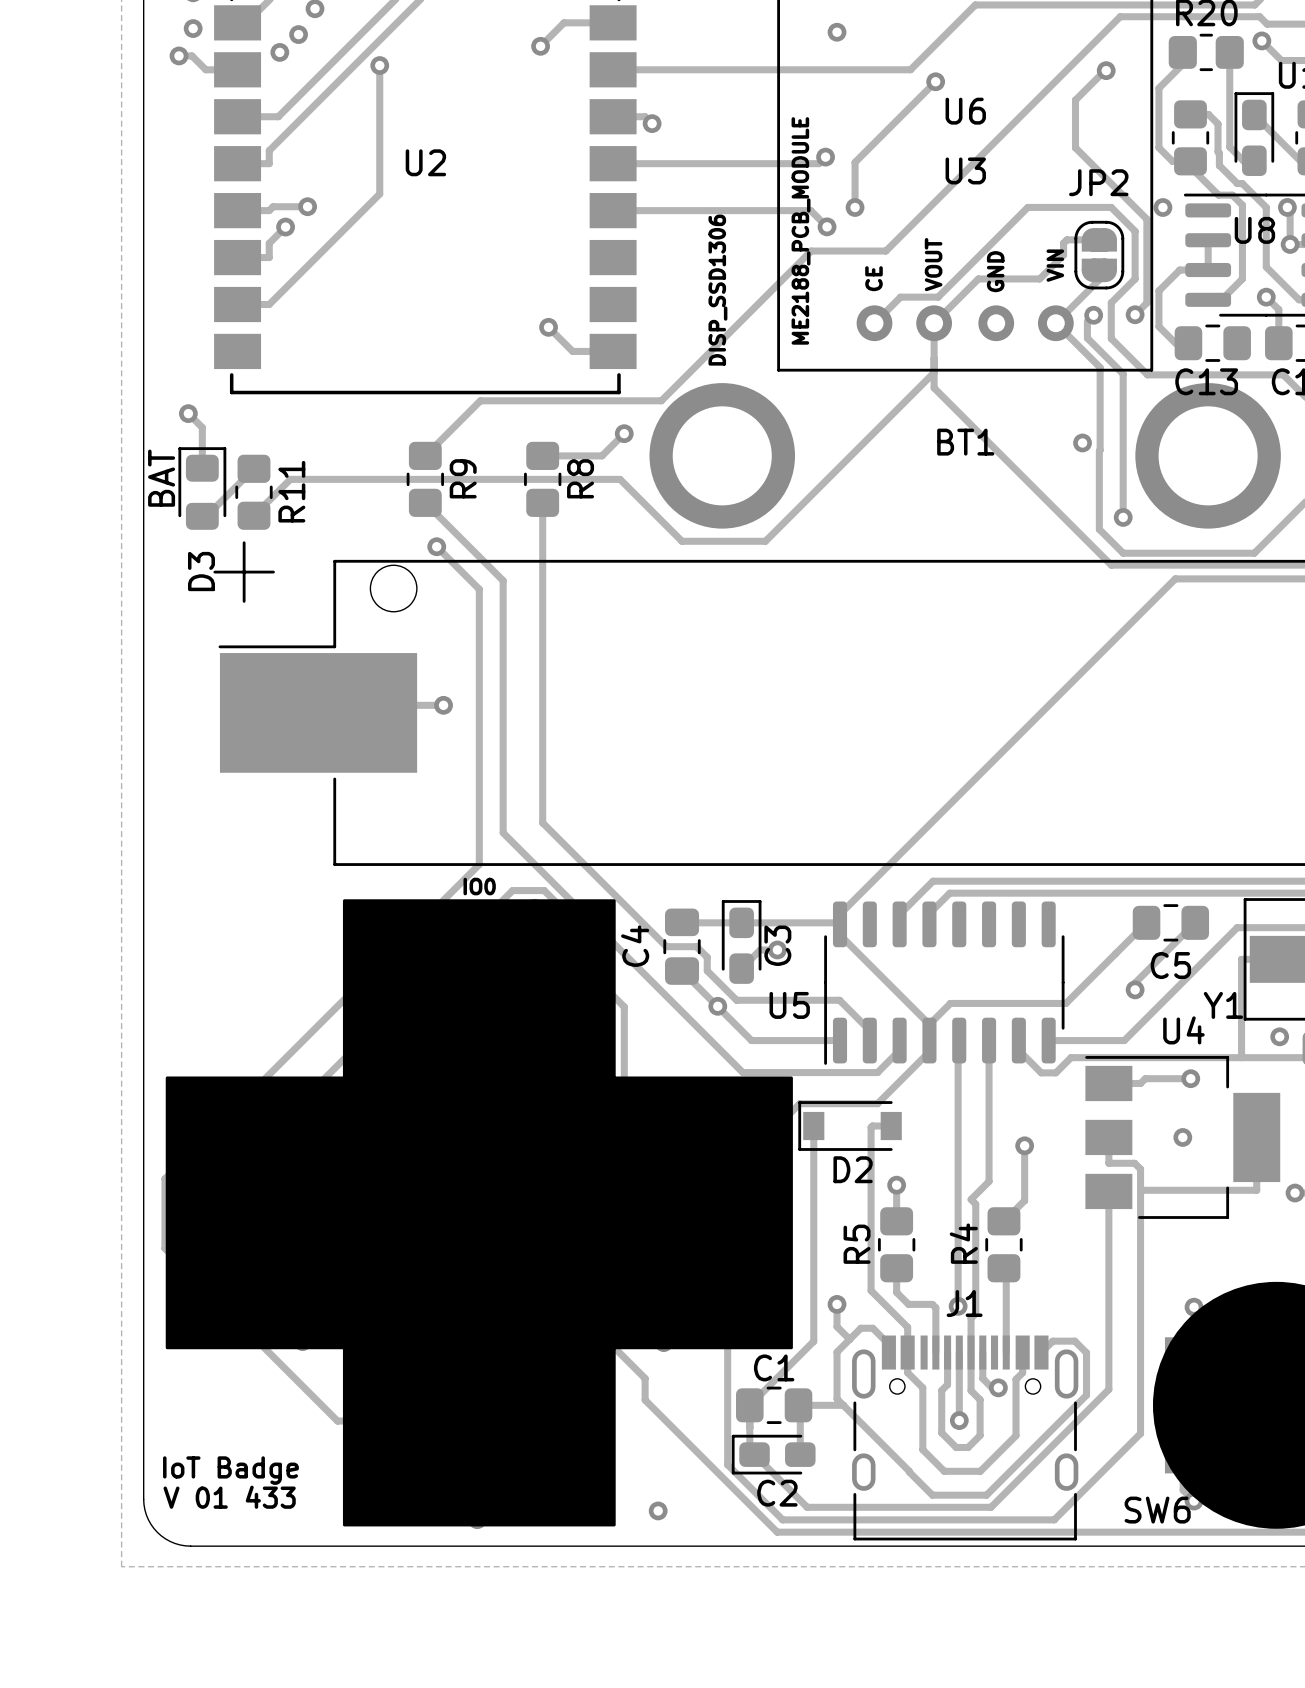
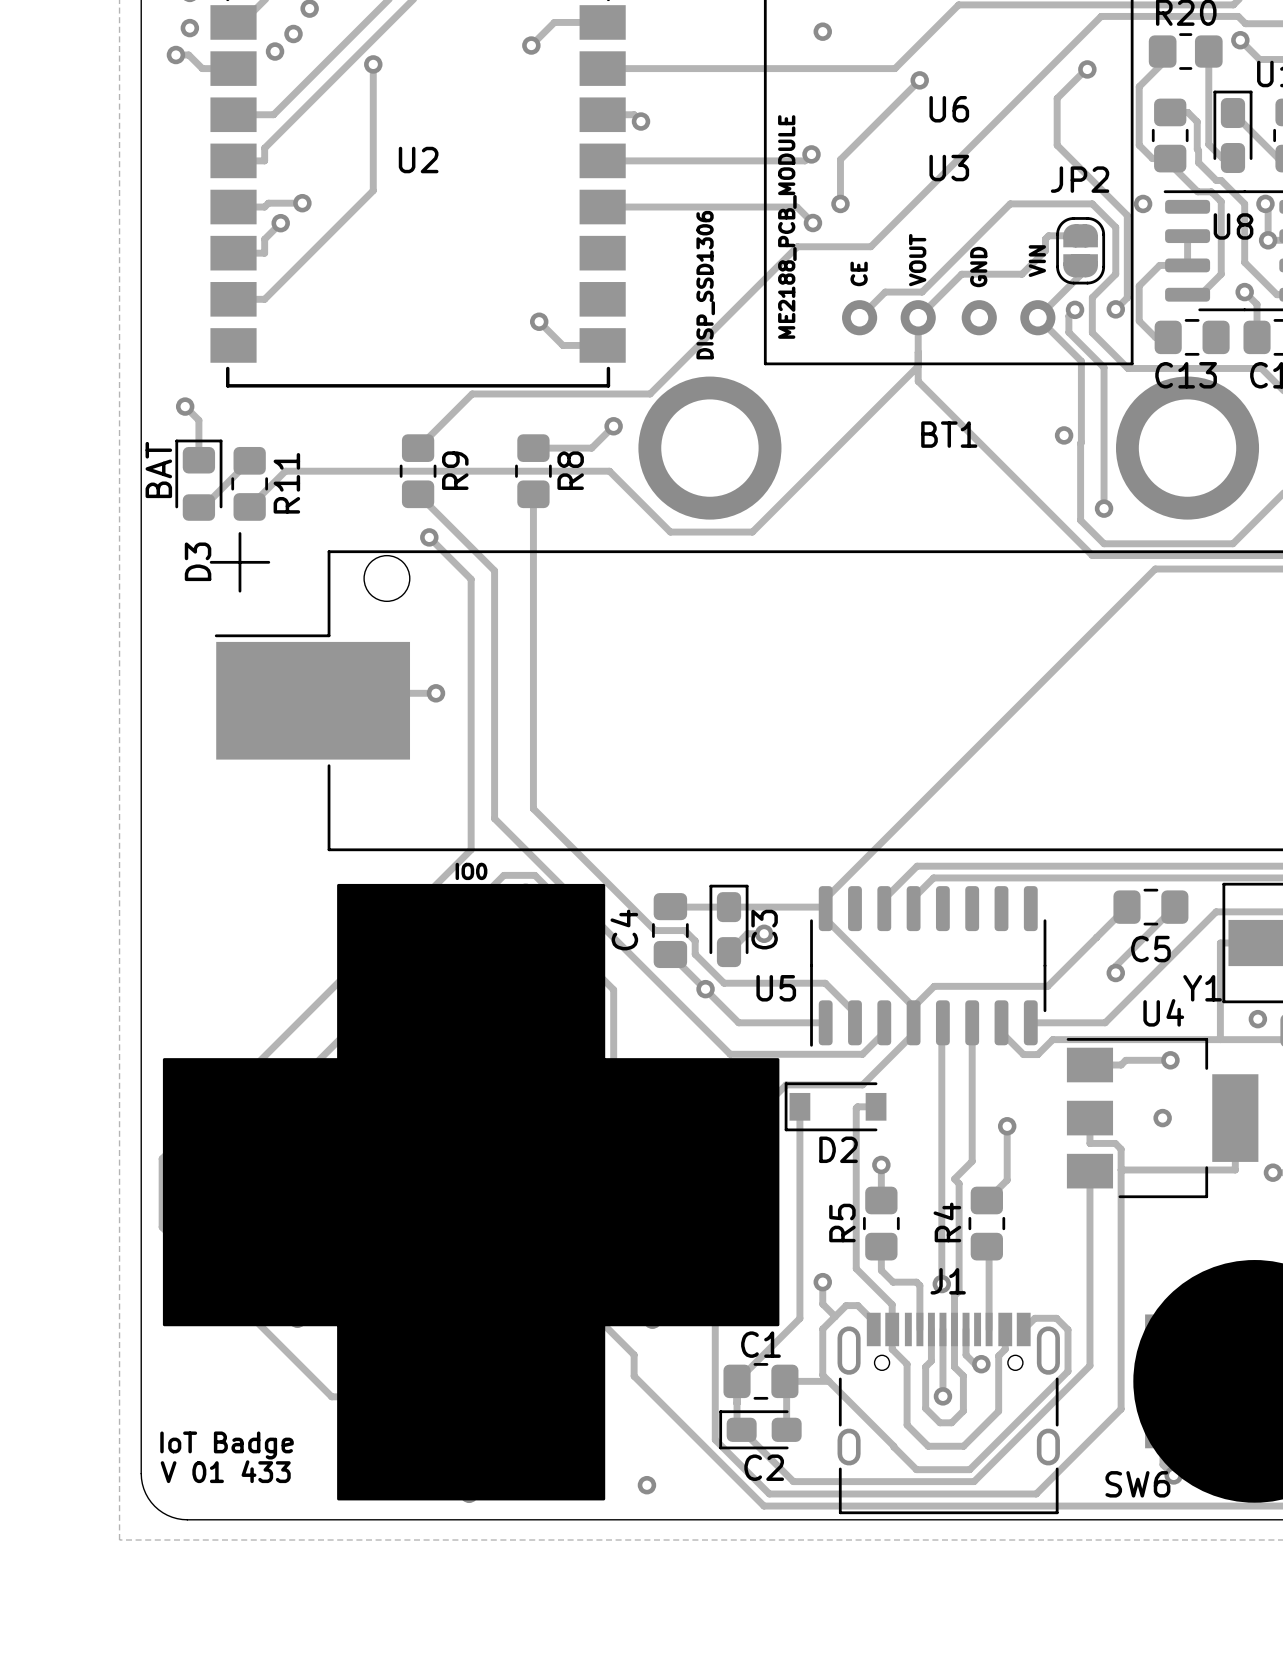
via: (1194, 1307) -> none

